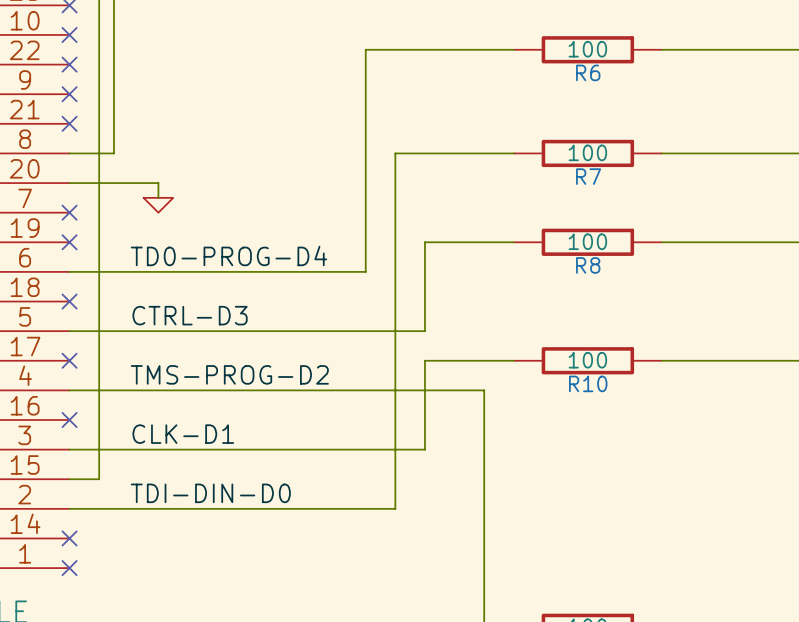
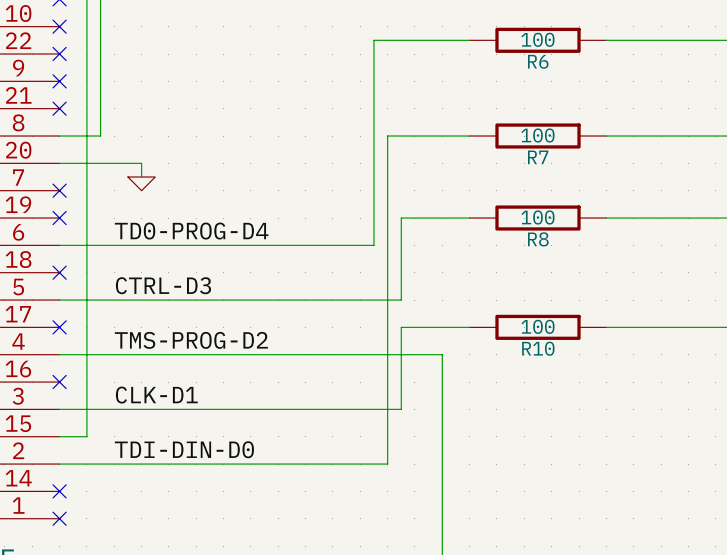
wire: (410, 49) (365, 49) (365, 271) -> (373, 40) (373, 245) (332, 245)
wire: (424, 153) (395, 153) (395, 508) -> (401, 327) (401, 409) (387, 409) (387, 464) (360, 464)
wire: (424, 242) (439, 242) -> (387, 218) (387, 136)
wire: (424, 360) (439, 360) -> (387, 327) (387, 300) (401, 300) (401, 218)

